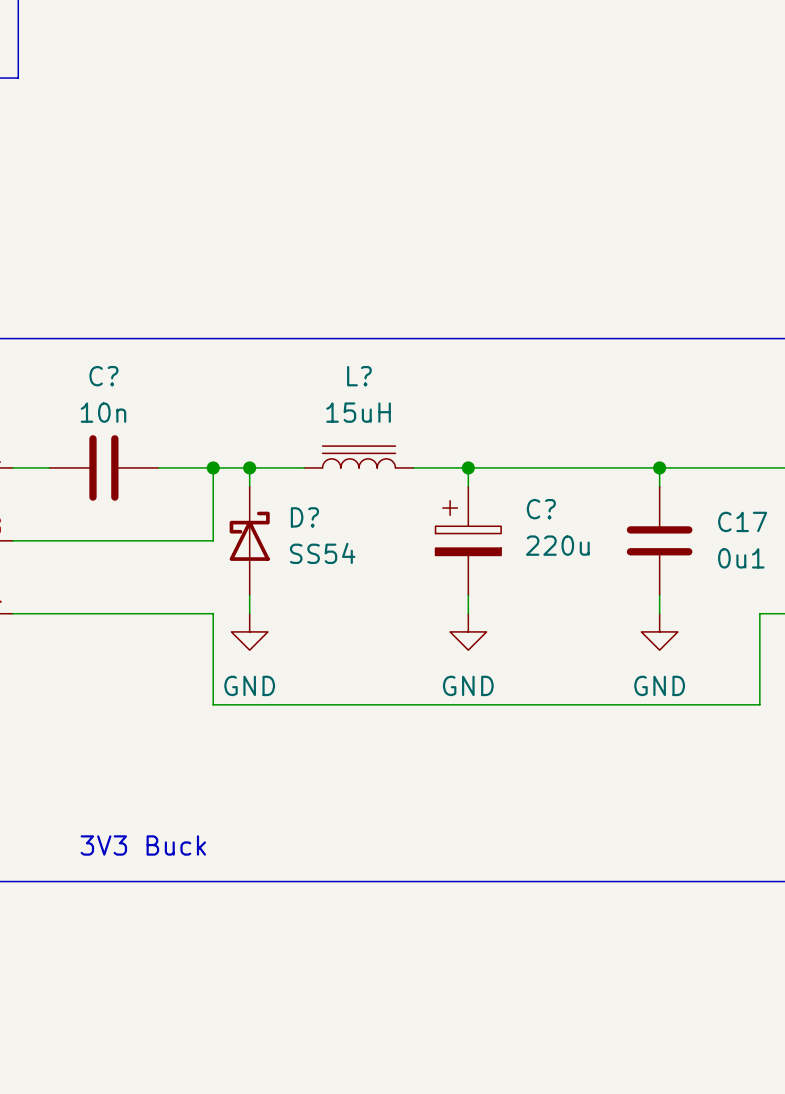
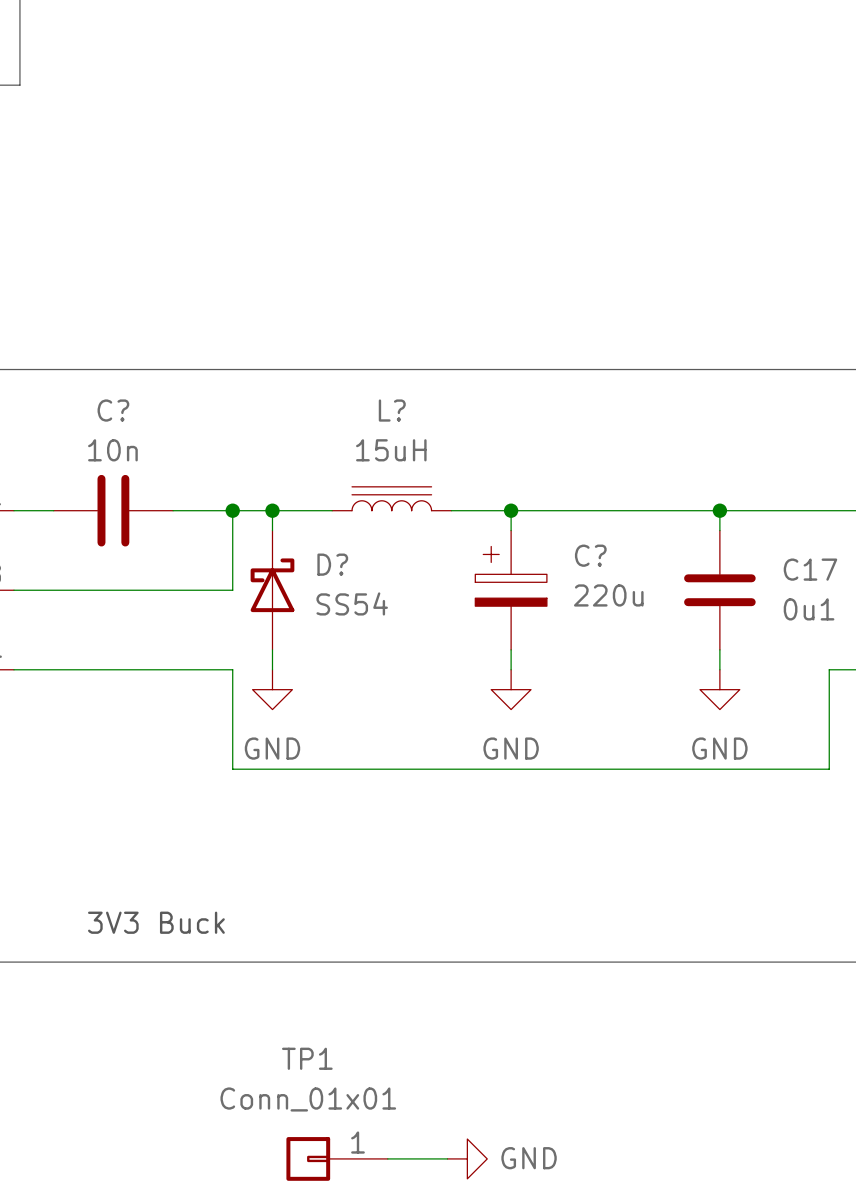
TP1: none -> Conn_01x01 (337, 1158)
wire: none -> (387, 1158) (447, 1158)
power symbol: none -> GND (467, 1158)

